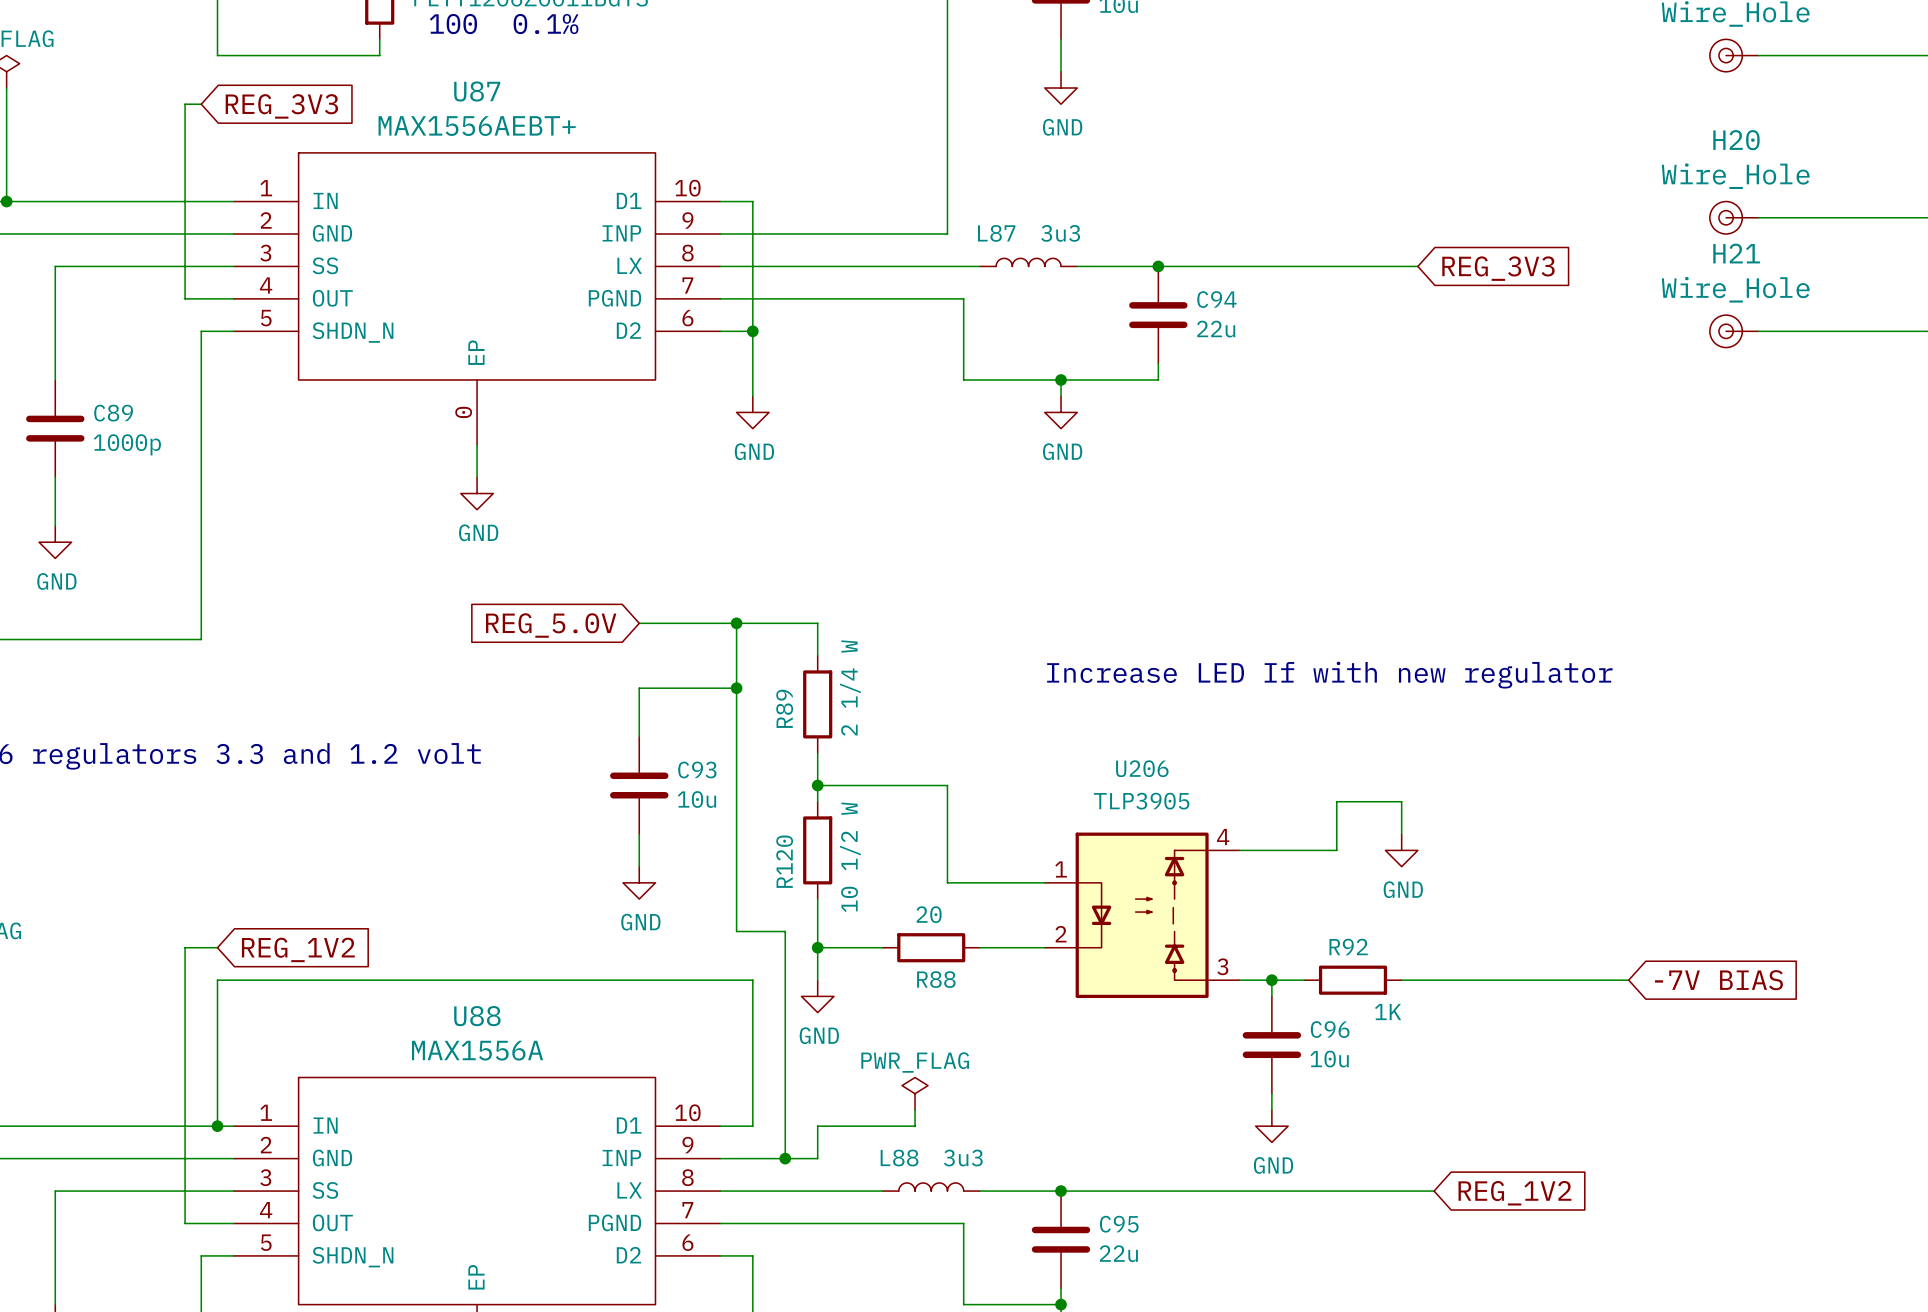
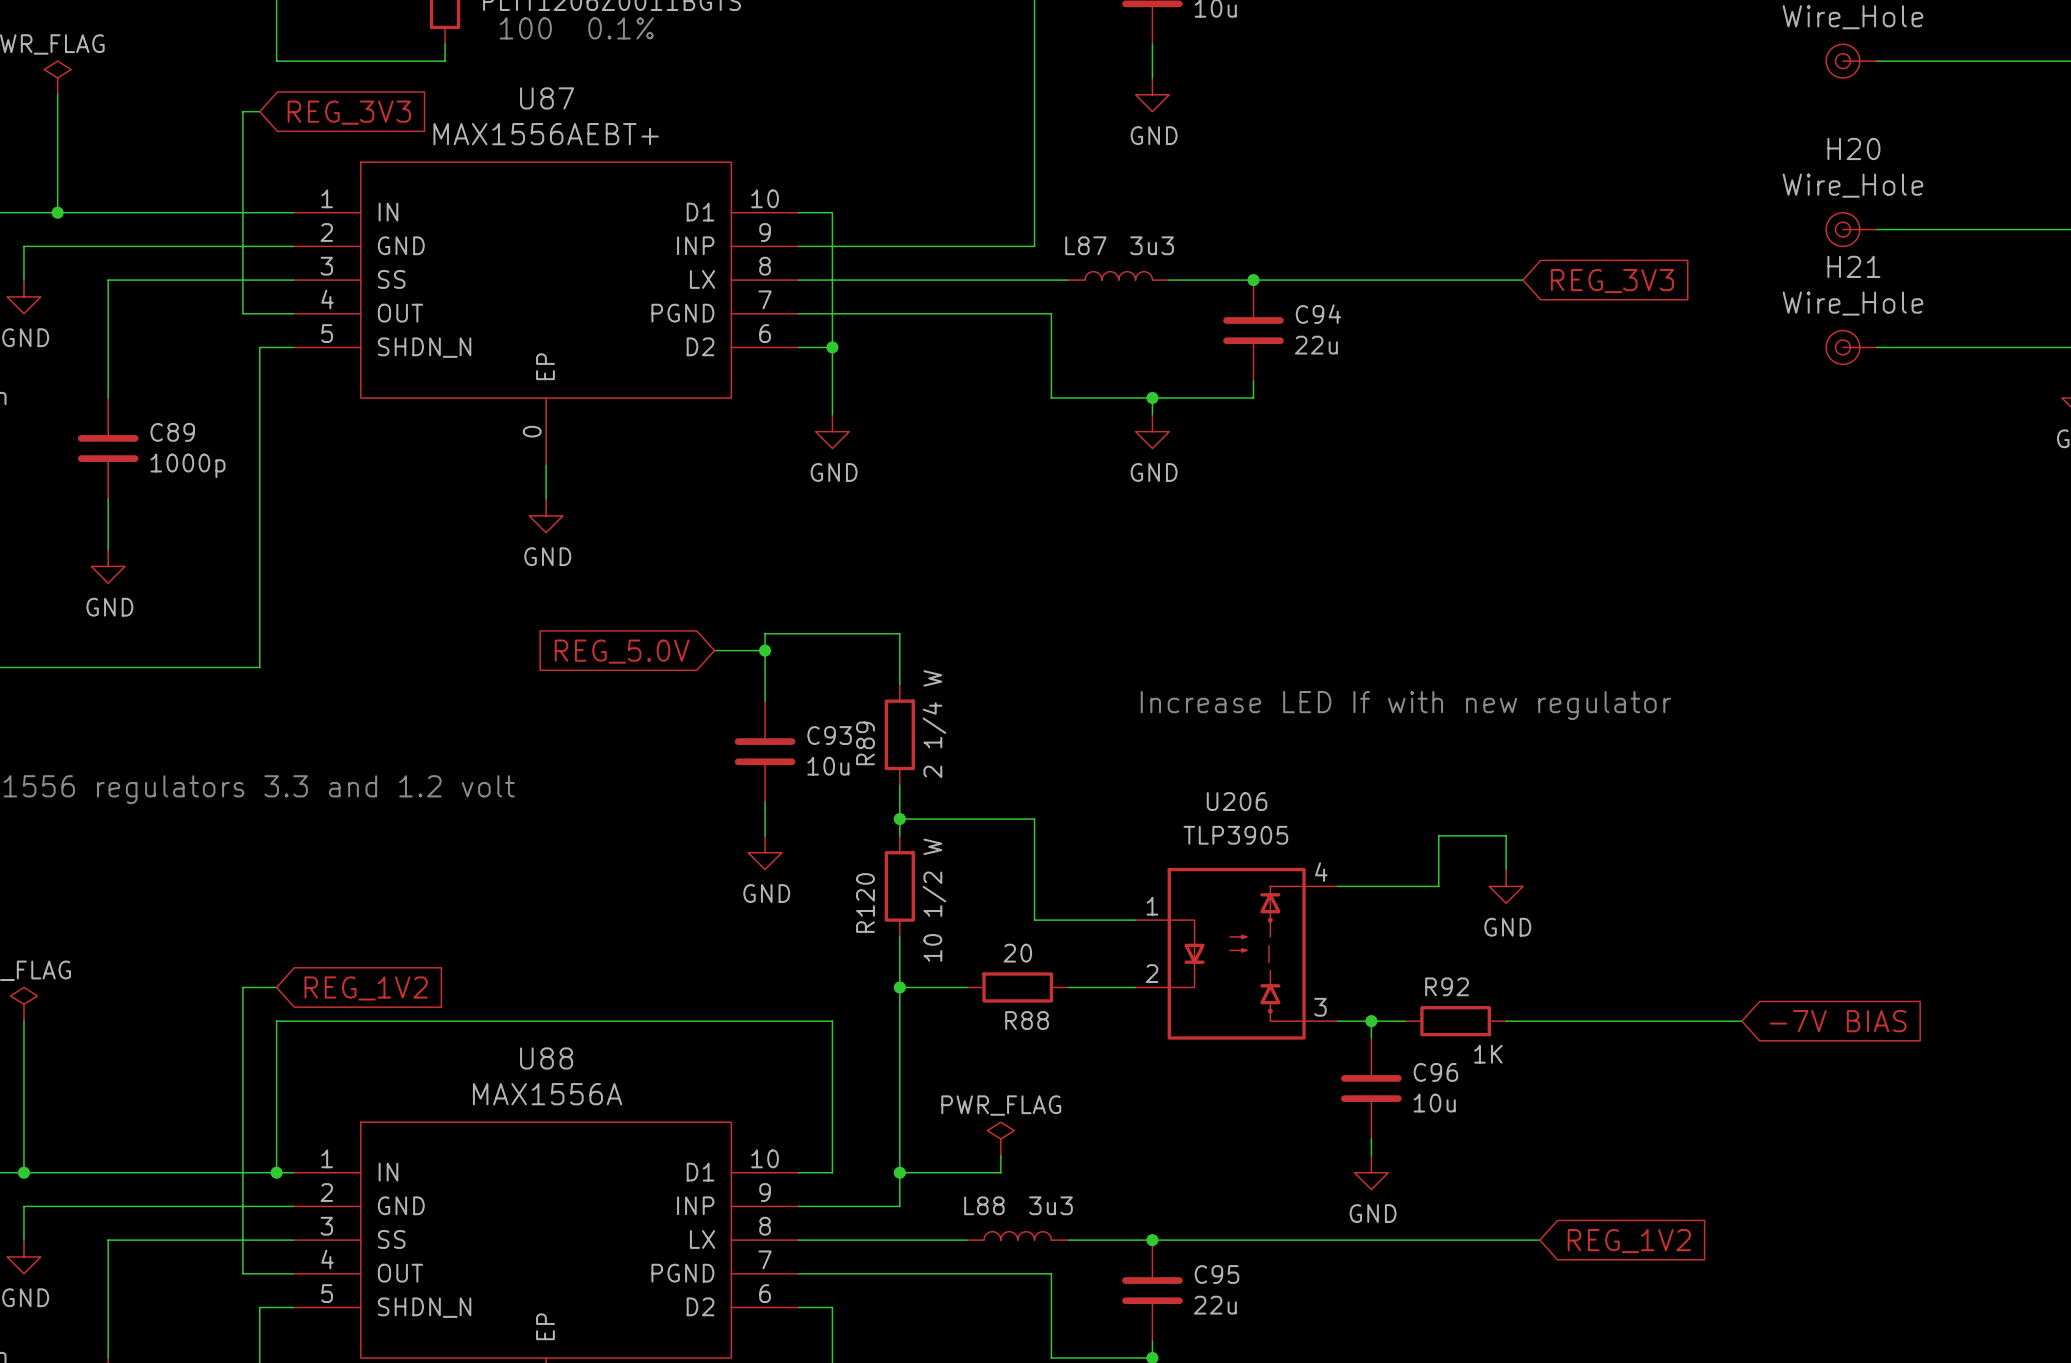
wire: (687, 623) (817, 623) -> (765, 701) (765, 633) (899, 633) (899, 650)
junction: none -> (765, 650)
wire: (736, 623) (736, 931) (785, 931) (785, 1158) -> none
junction: (736, 623) -> none
wire: (736, 688) (639, 688) (639, 736) -> none
junction: (736, 688) -> none
C93 position: (639, 785) -> (765, 751)
wire: (639, 834) (639, 866) -> (765, 802) (765, 835)
power symbol position: GND (639, 882) -> GND (765, 852)
wire: none -> (899, 1021) (899, 1172)
power symbol: GND (817, 996) -> none
junction position: (785, 1158) -> (899, 1172)

